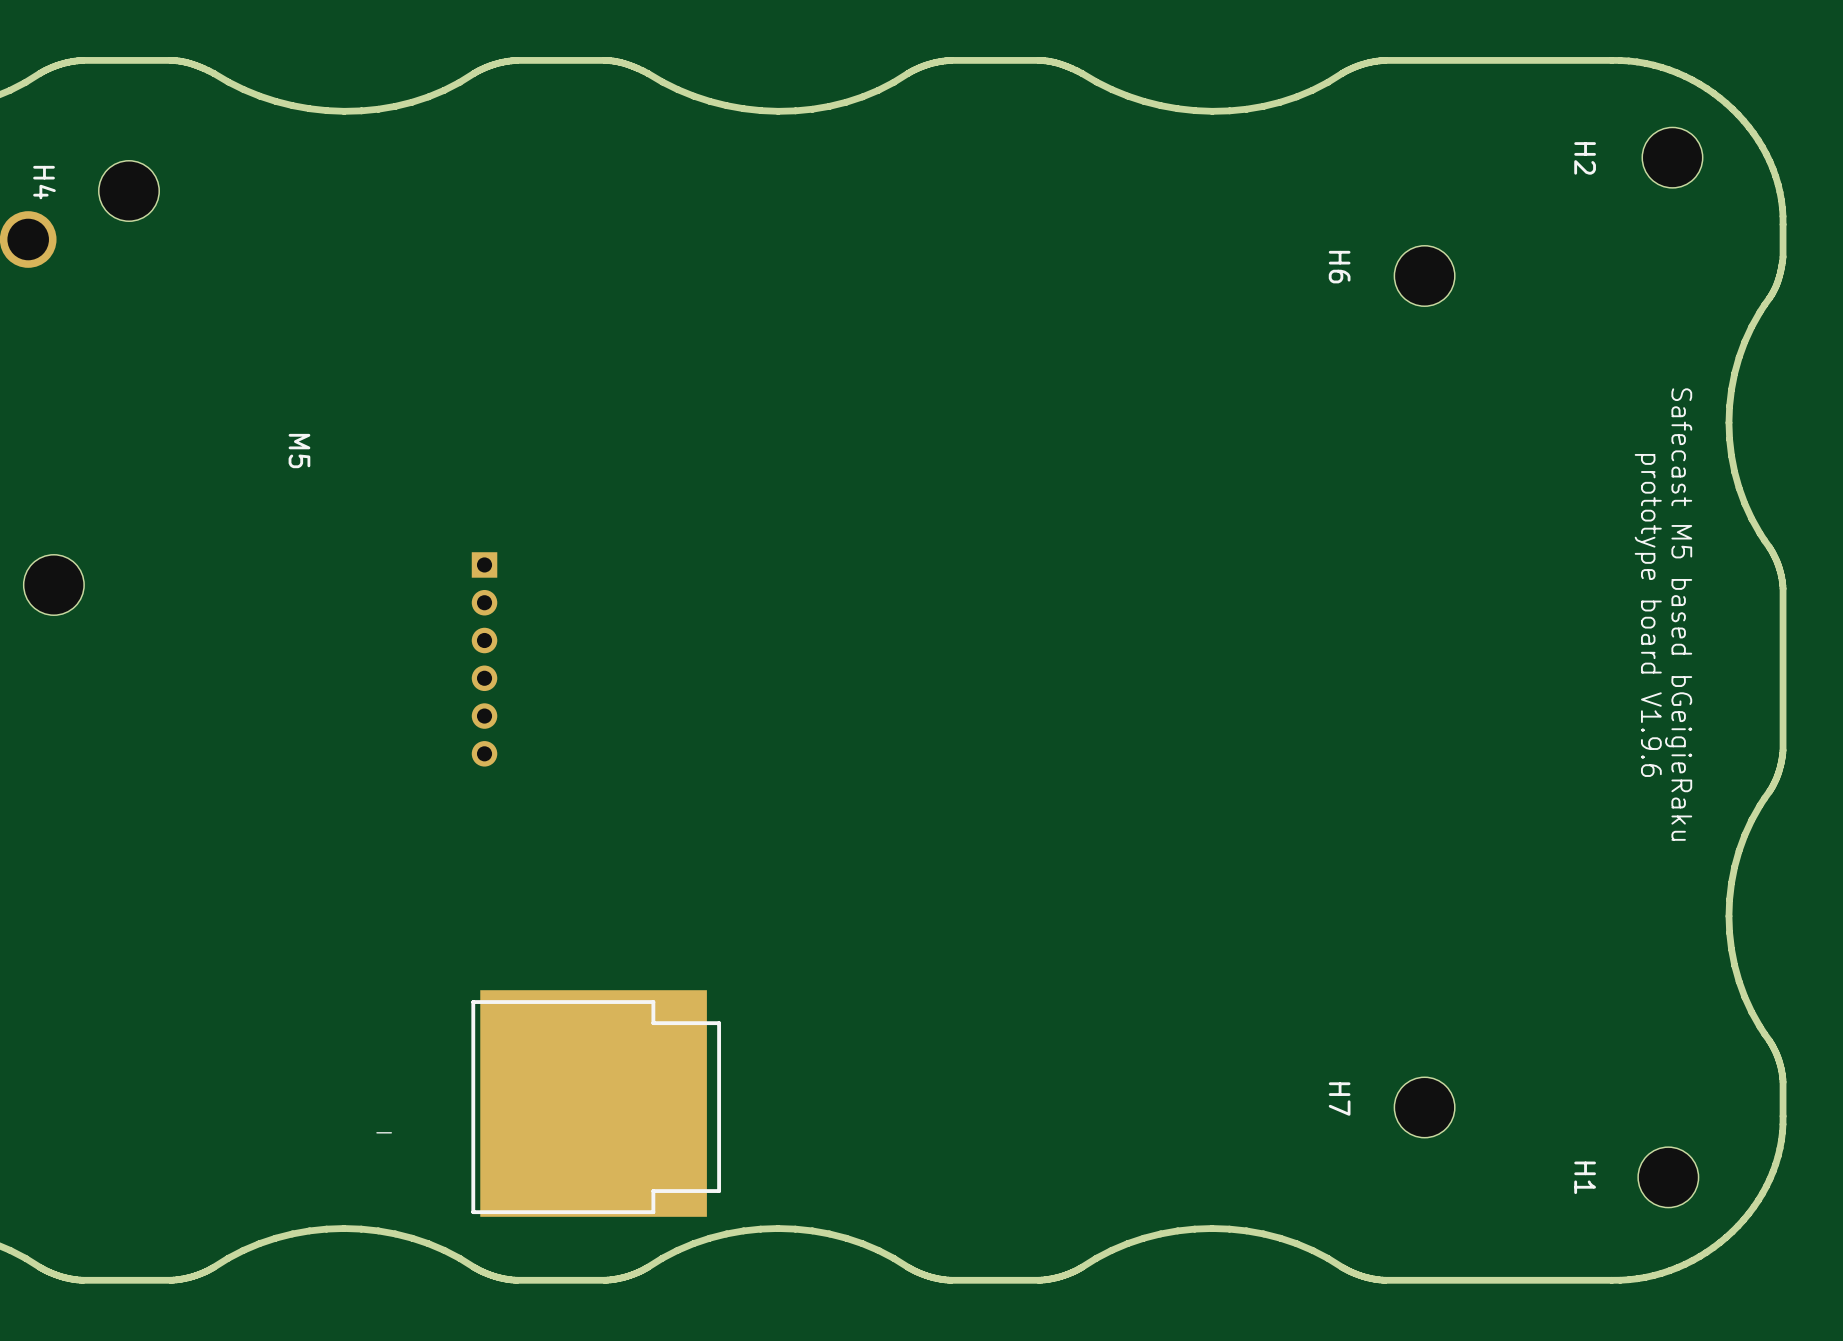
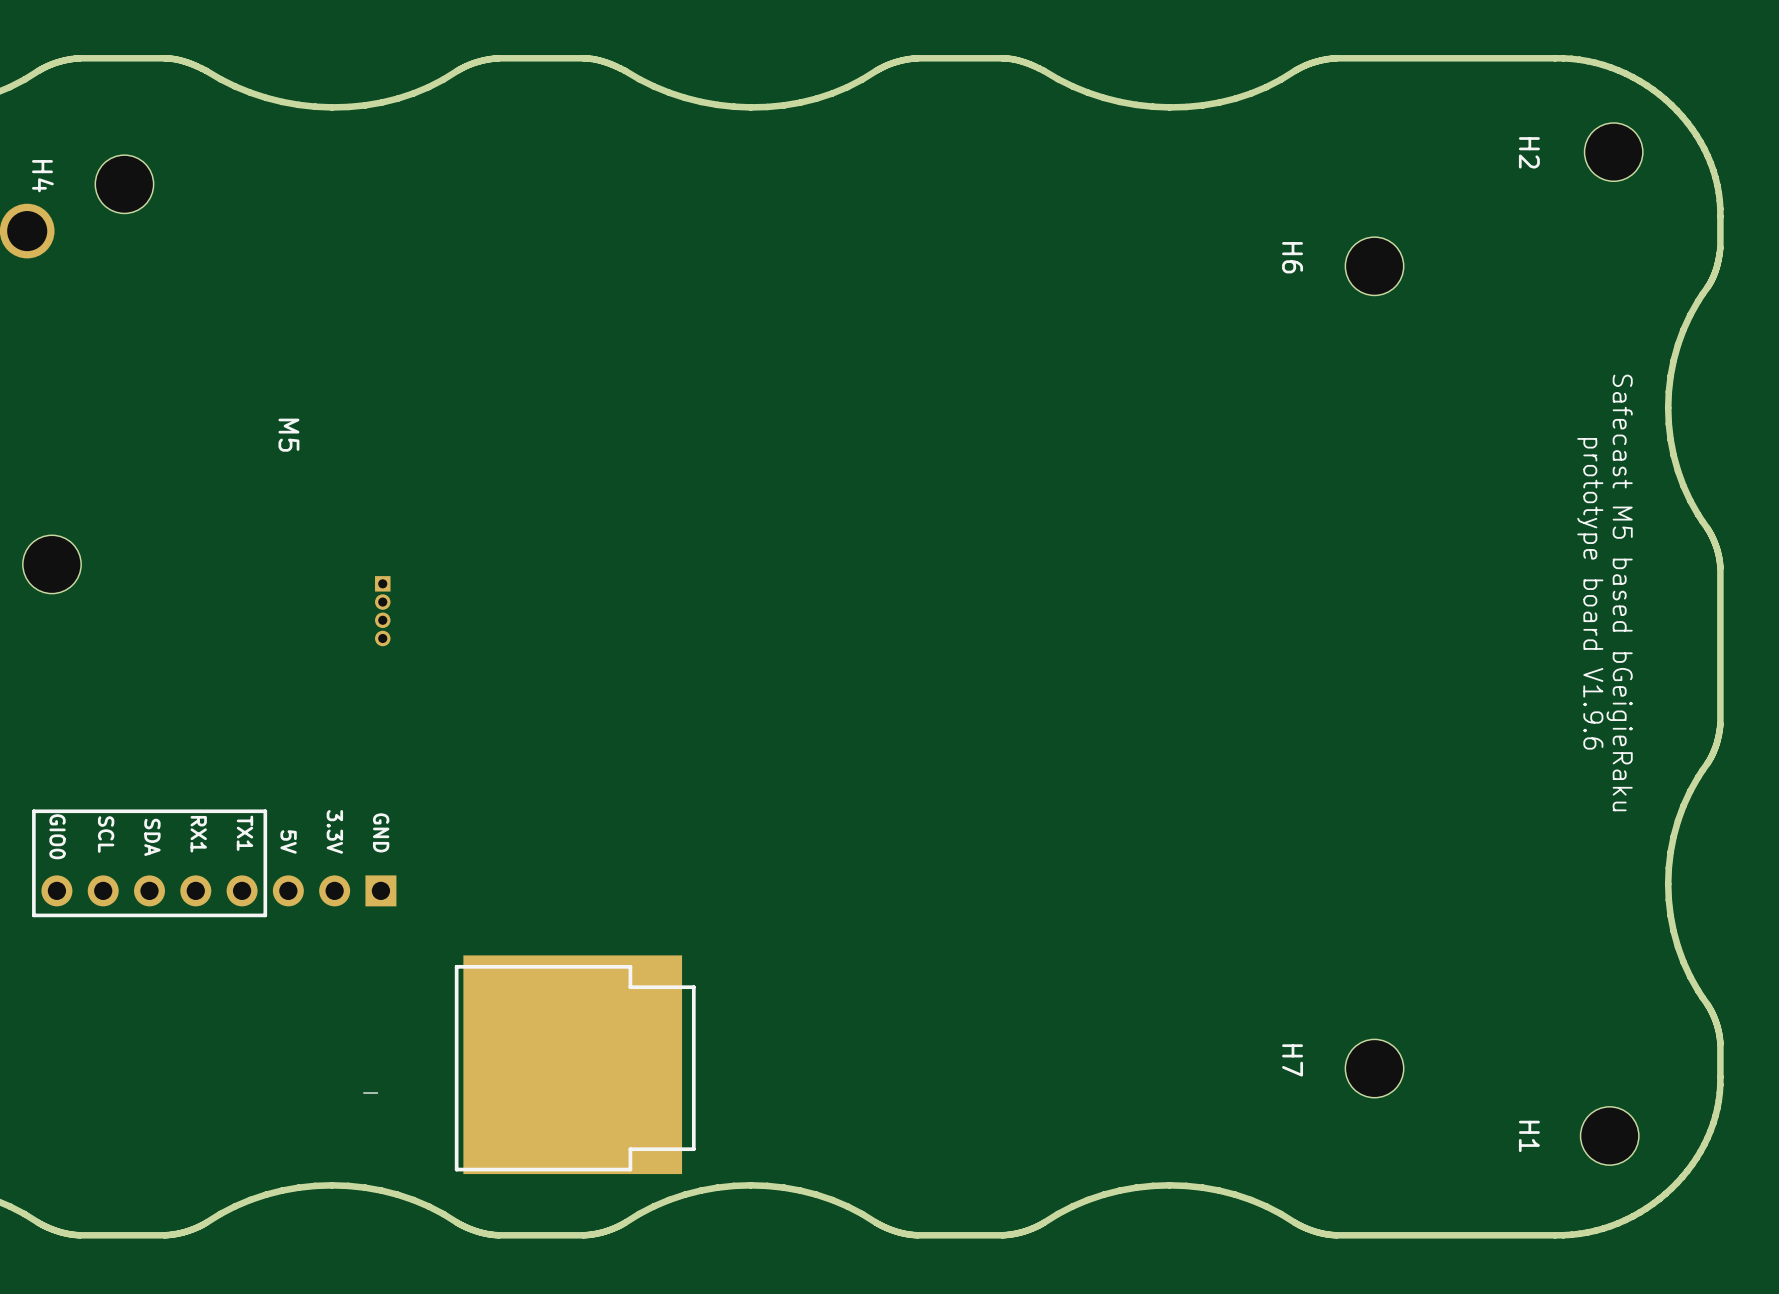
part: none -> (382, 611)
part: (484, 659) -> none
line: none -> (265, 811) (265, 915) (33, 915) (33, 811) (265, 811)
text: none -> 3.3V (334, 831)
text: none -> TX1 (244, 833)
text: none -> GND (381, 832)
text: none -> SCL (106, 834)
text: none -> RX1 (198, 834)
text: none -> GIO0 (57, 836)
text: none -> SDA (152, 837)
text: none -> 5V (288, 841)
part: none -> (218, 890)

